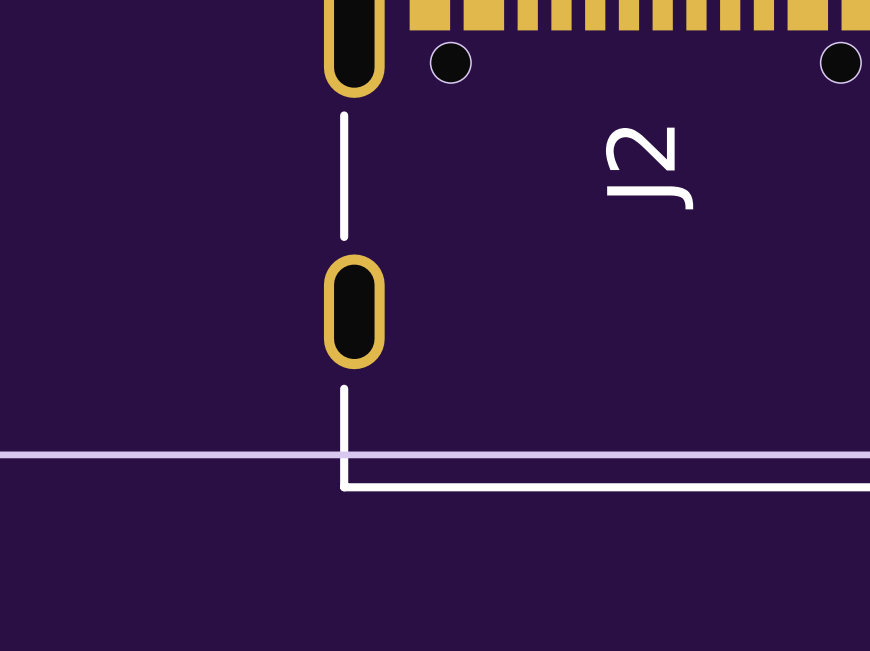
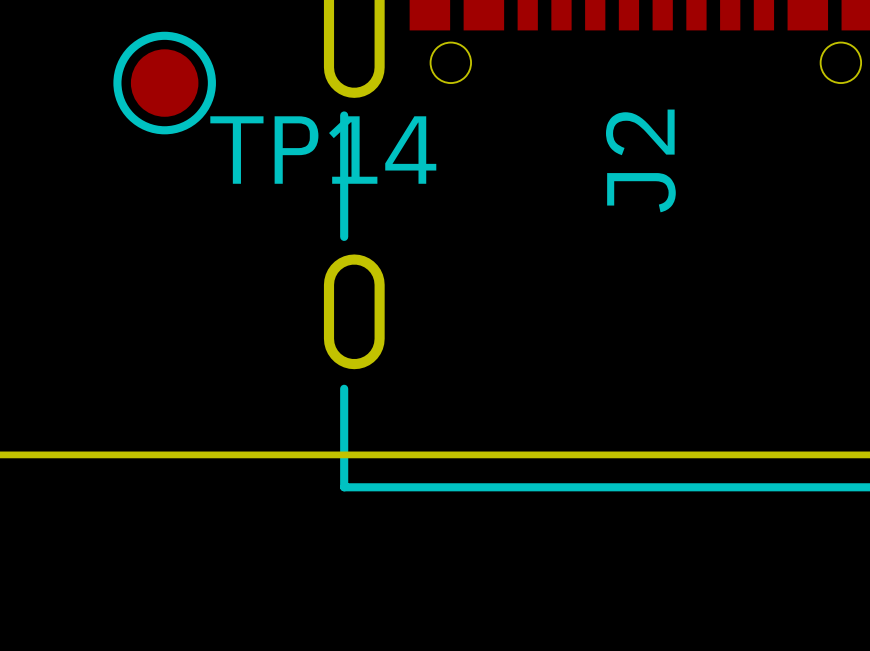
TP14: none -> (164, 83)

